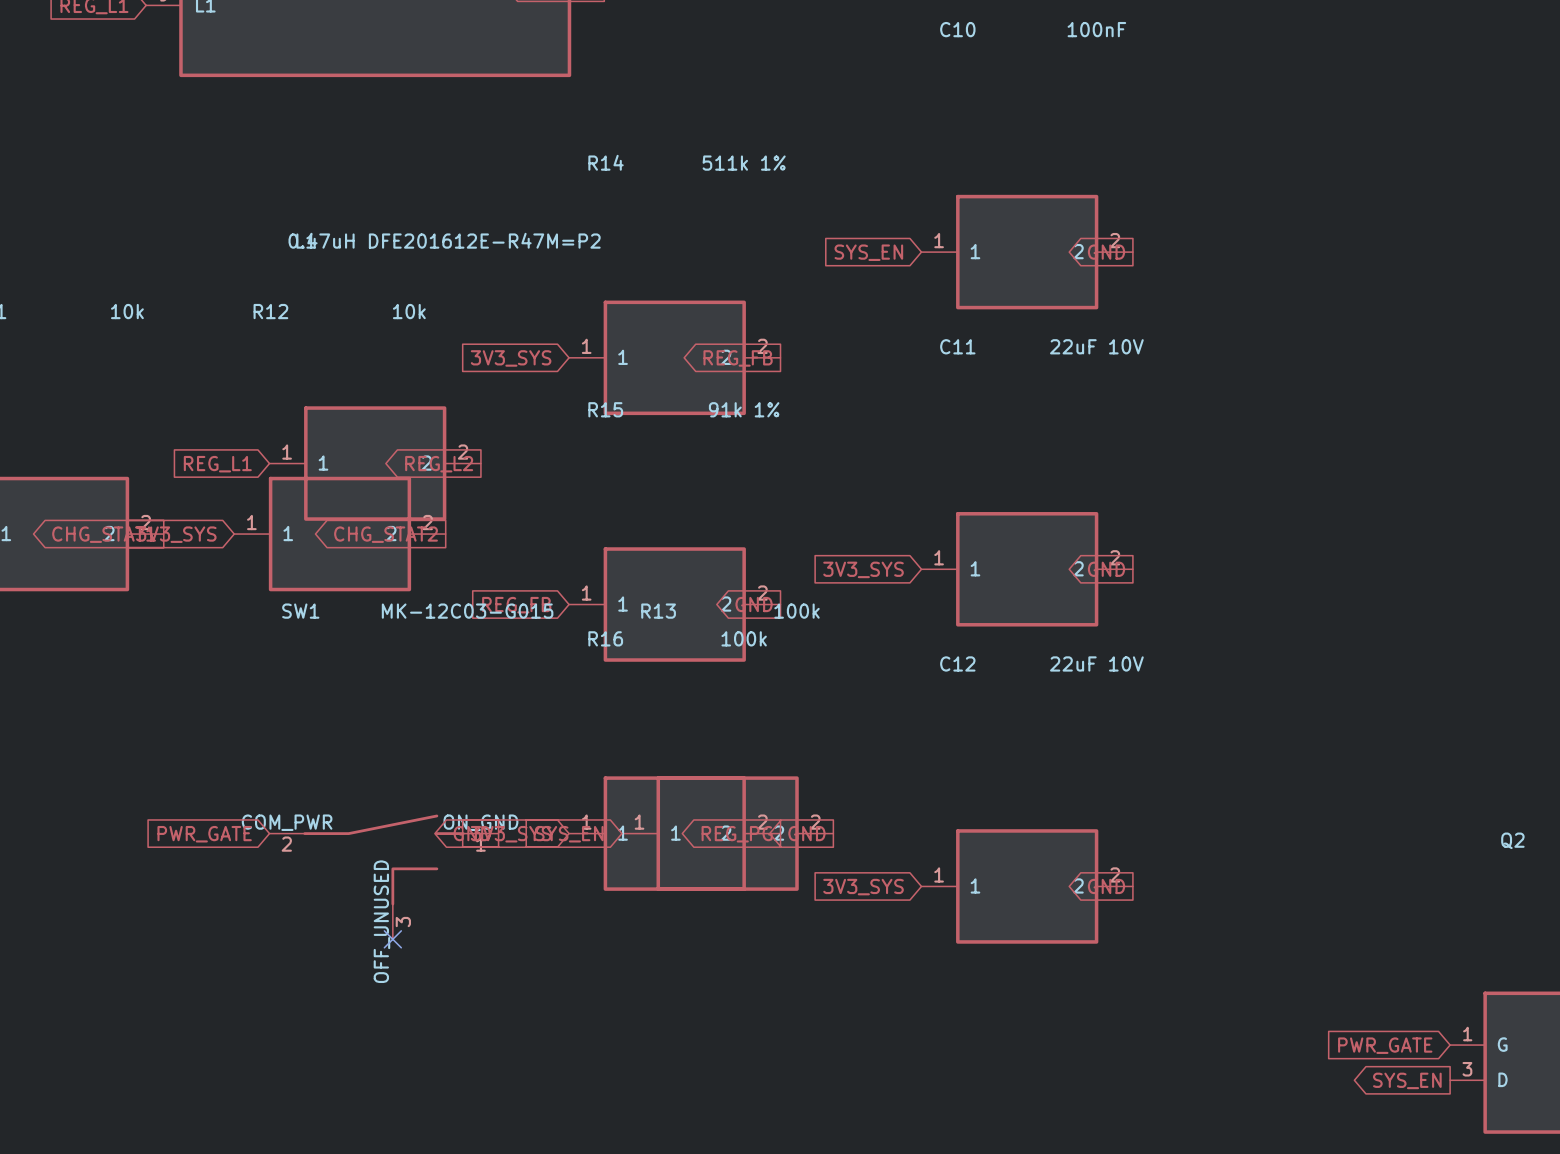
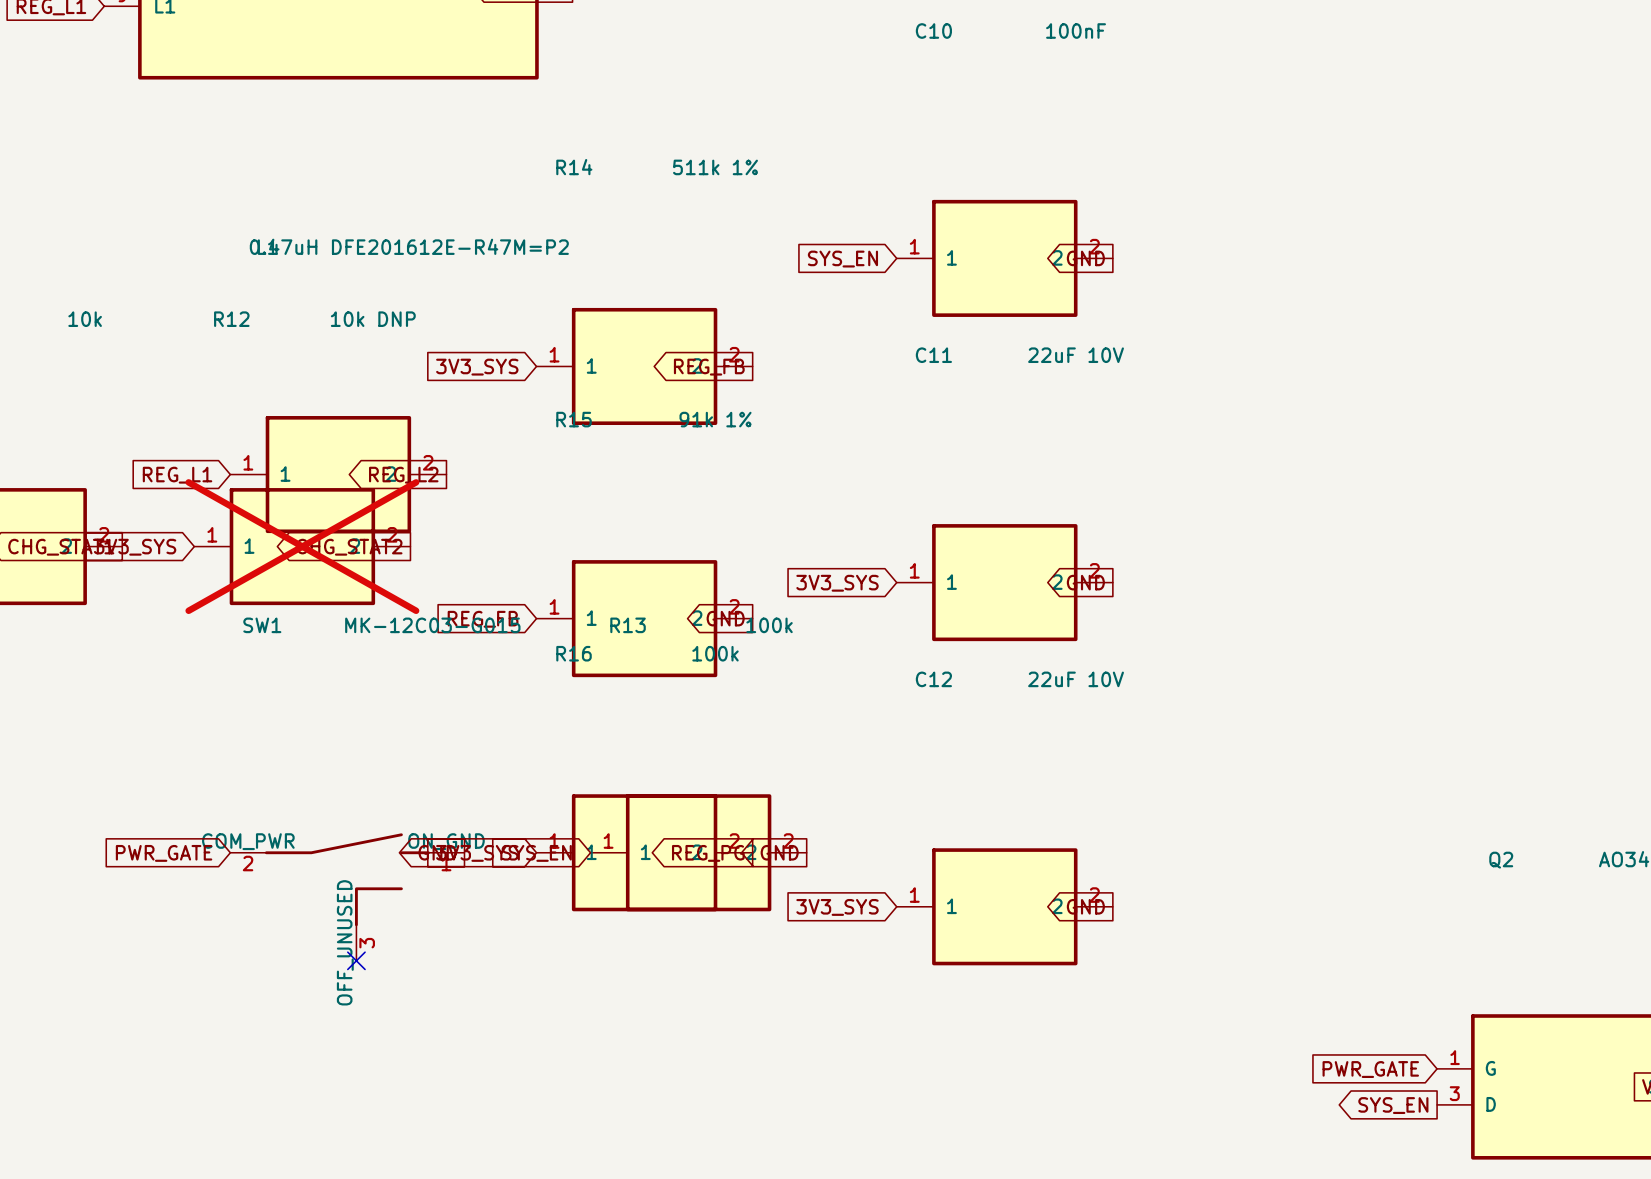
R12 value: 10k (409, 311) -> 10k DNP (373, 319)
R12 do-not-place cross: none -> (302, 546)

